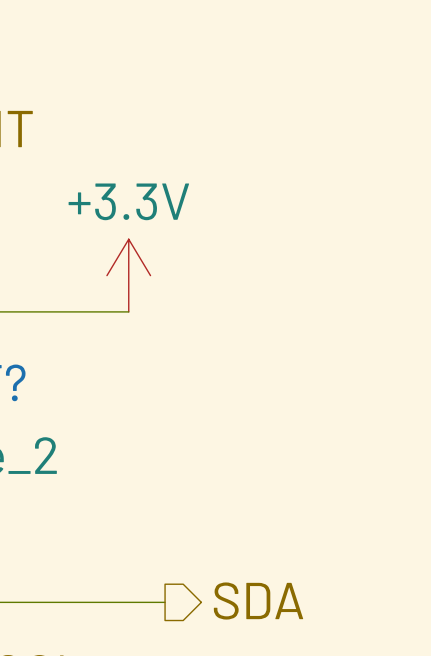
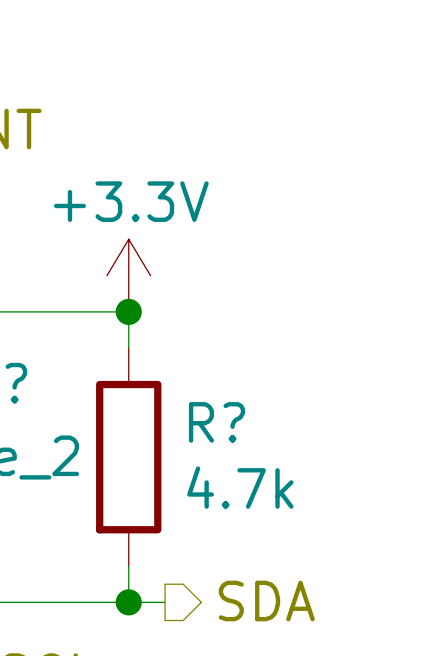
wire: none -> (128, 311) (128, 348)
junction: none -> (128, 311)
R?: none -> 4.7k (128, 457)
wire: none -> (128, 566) (128, 602)
junction: none -> (128, 602)

